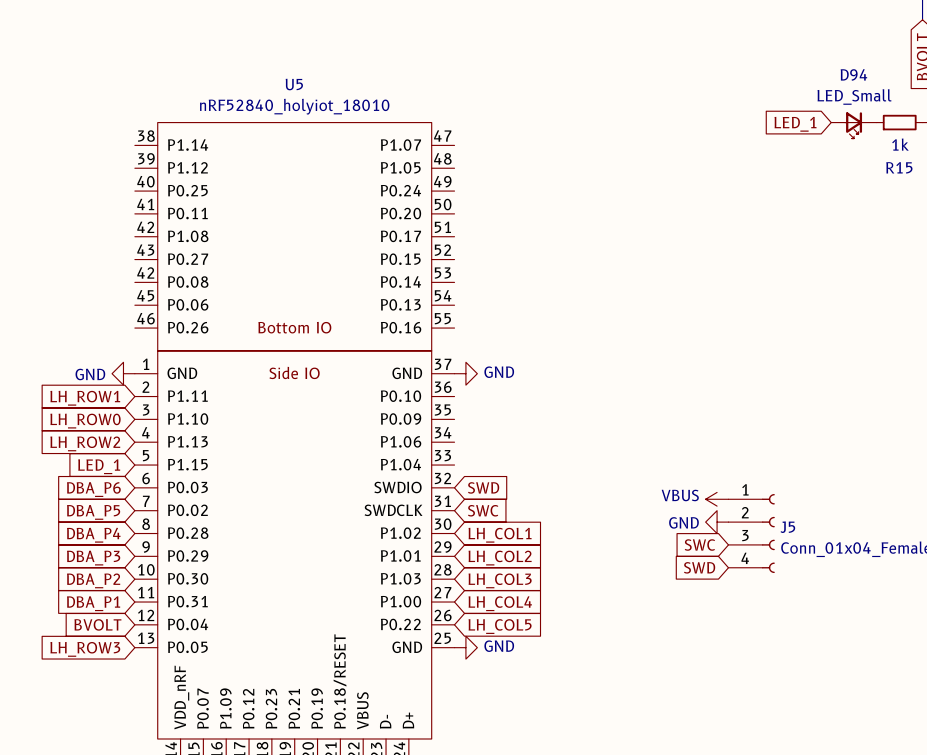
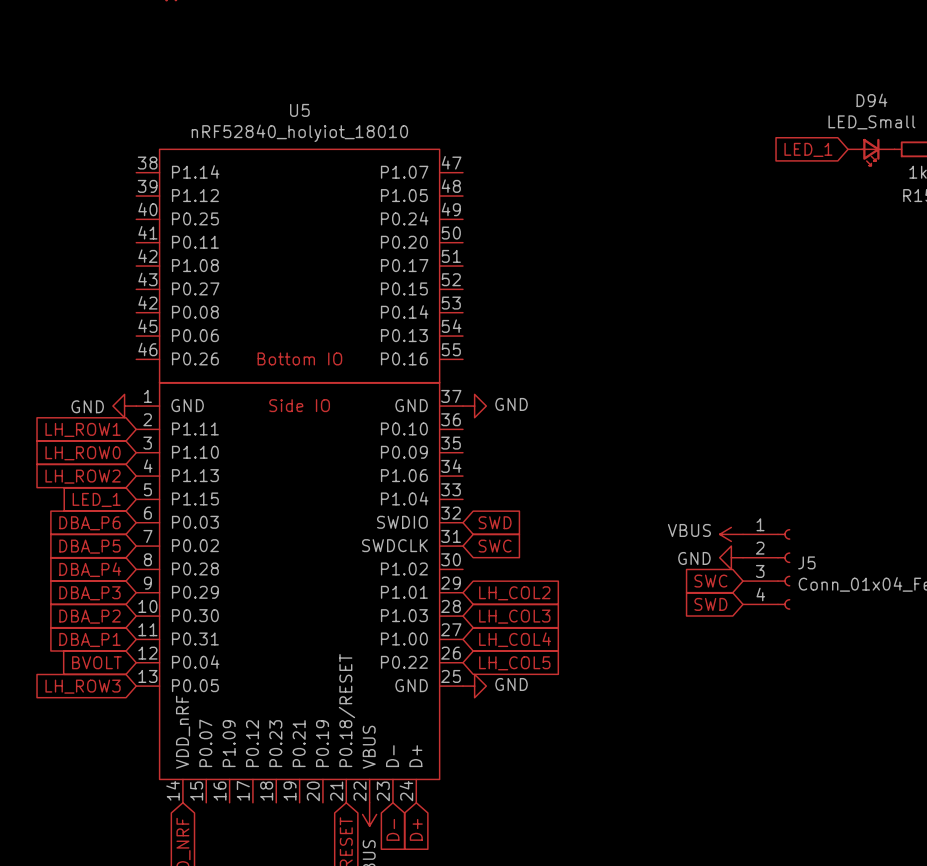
global label: LH_COL1 (500, 535) -> none

